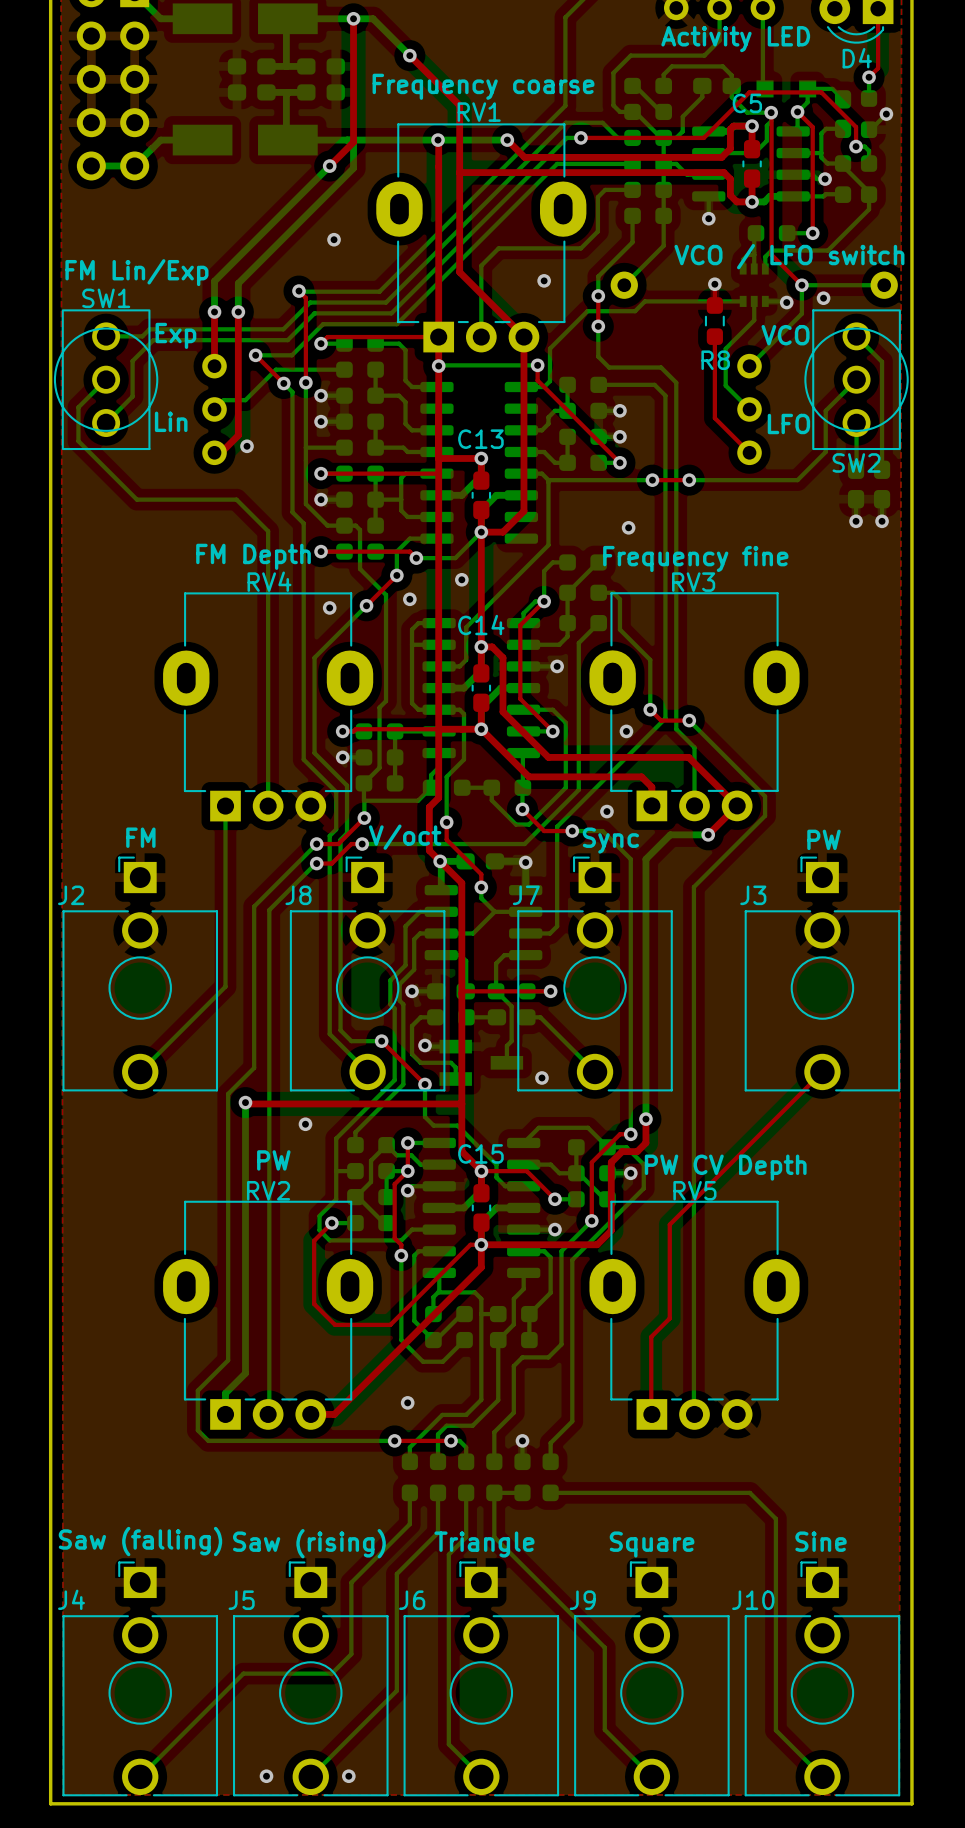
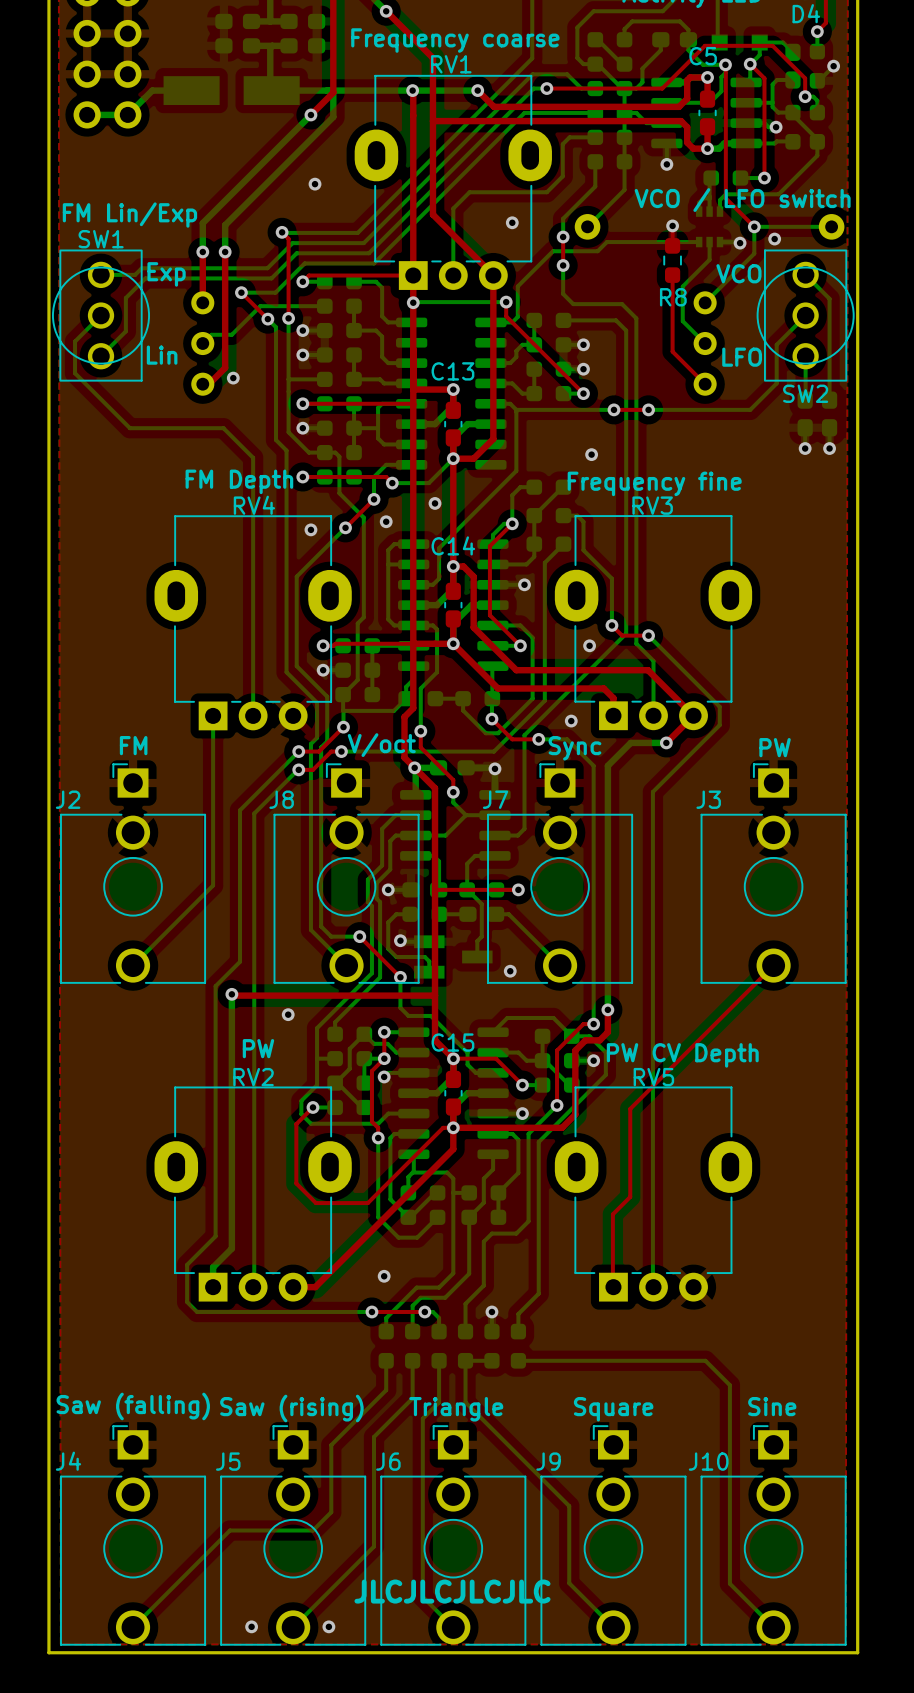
text: none -> JLCJLCJLCJLC (452, 1591)

